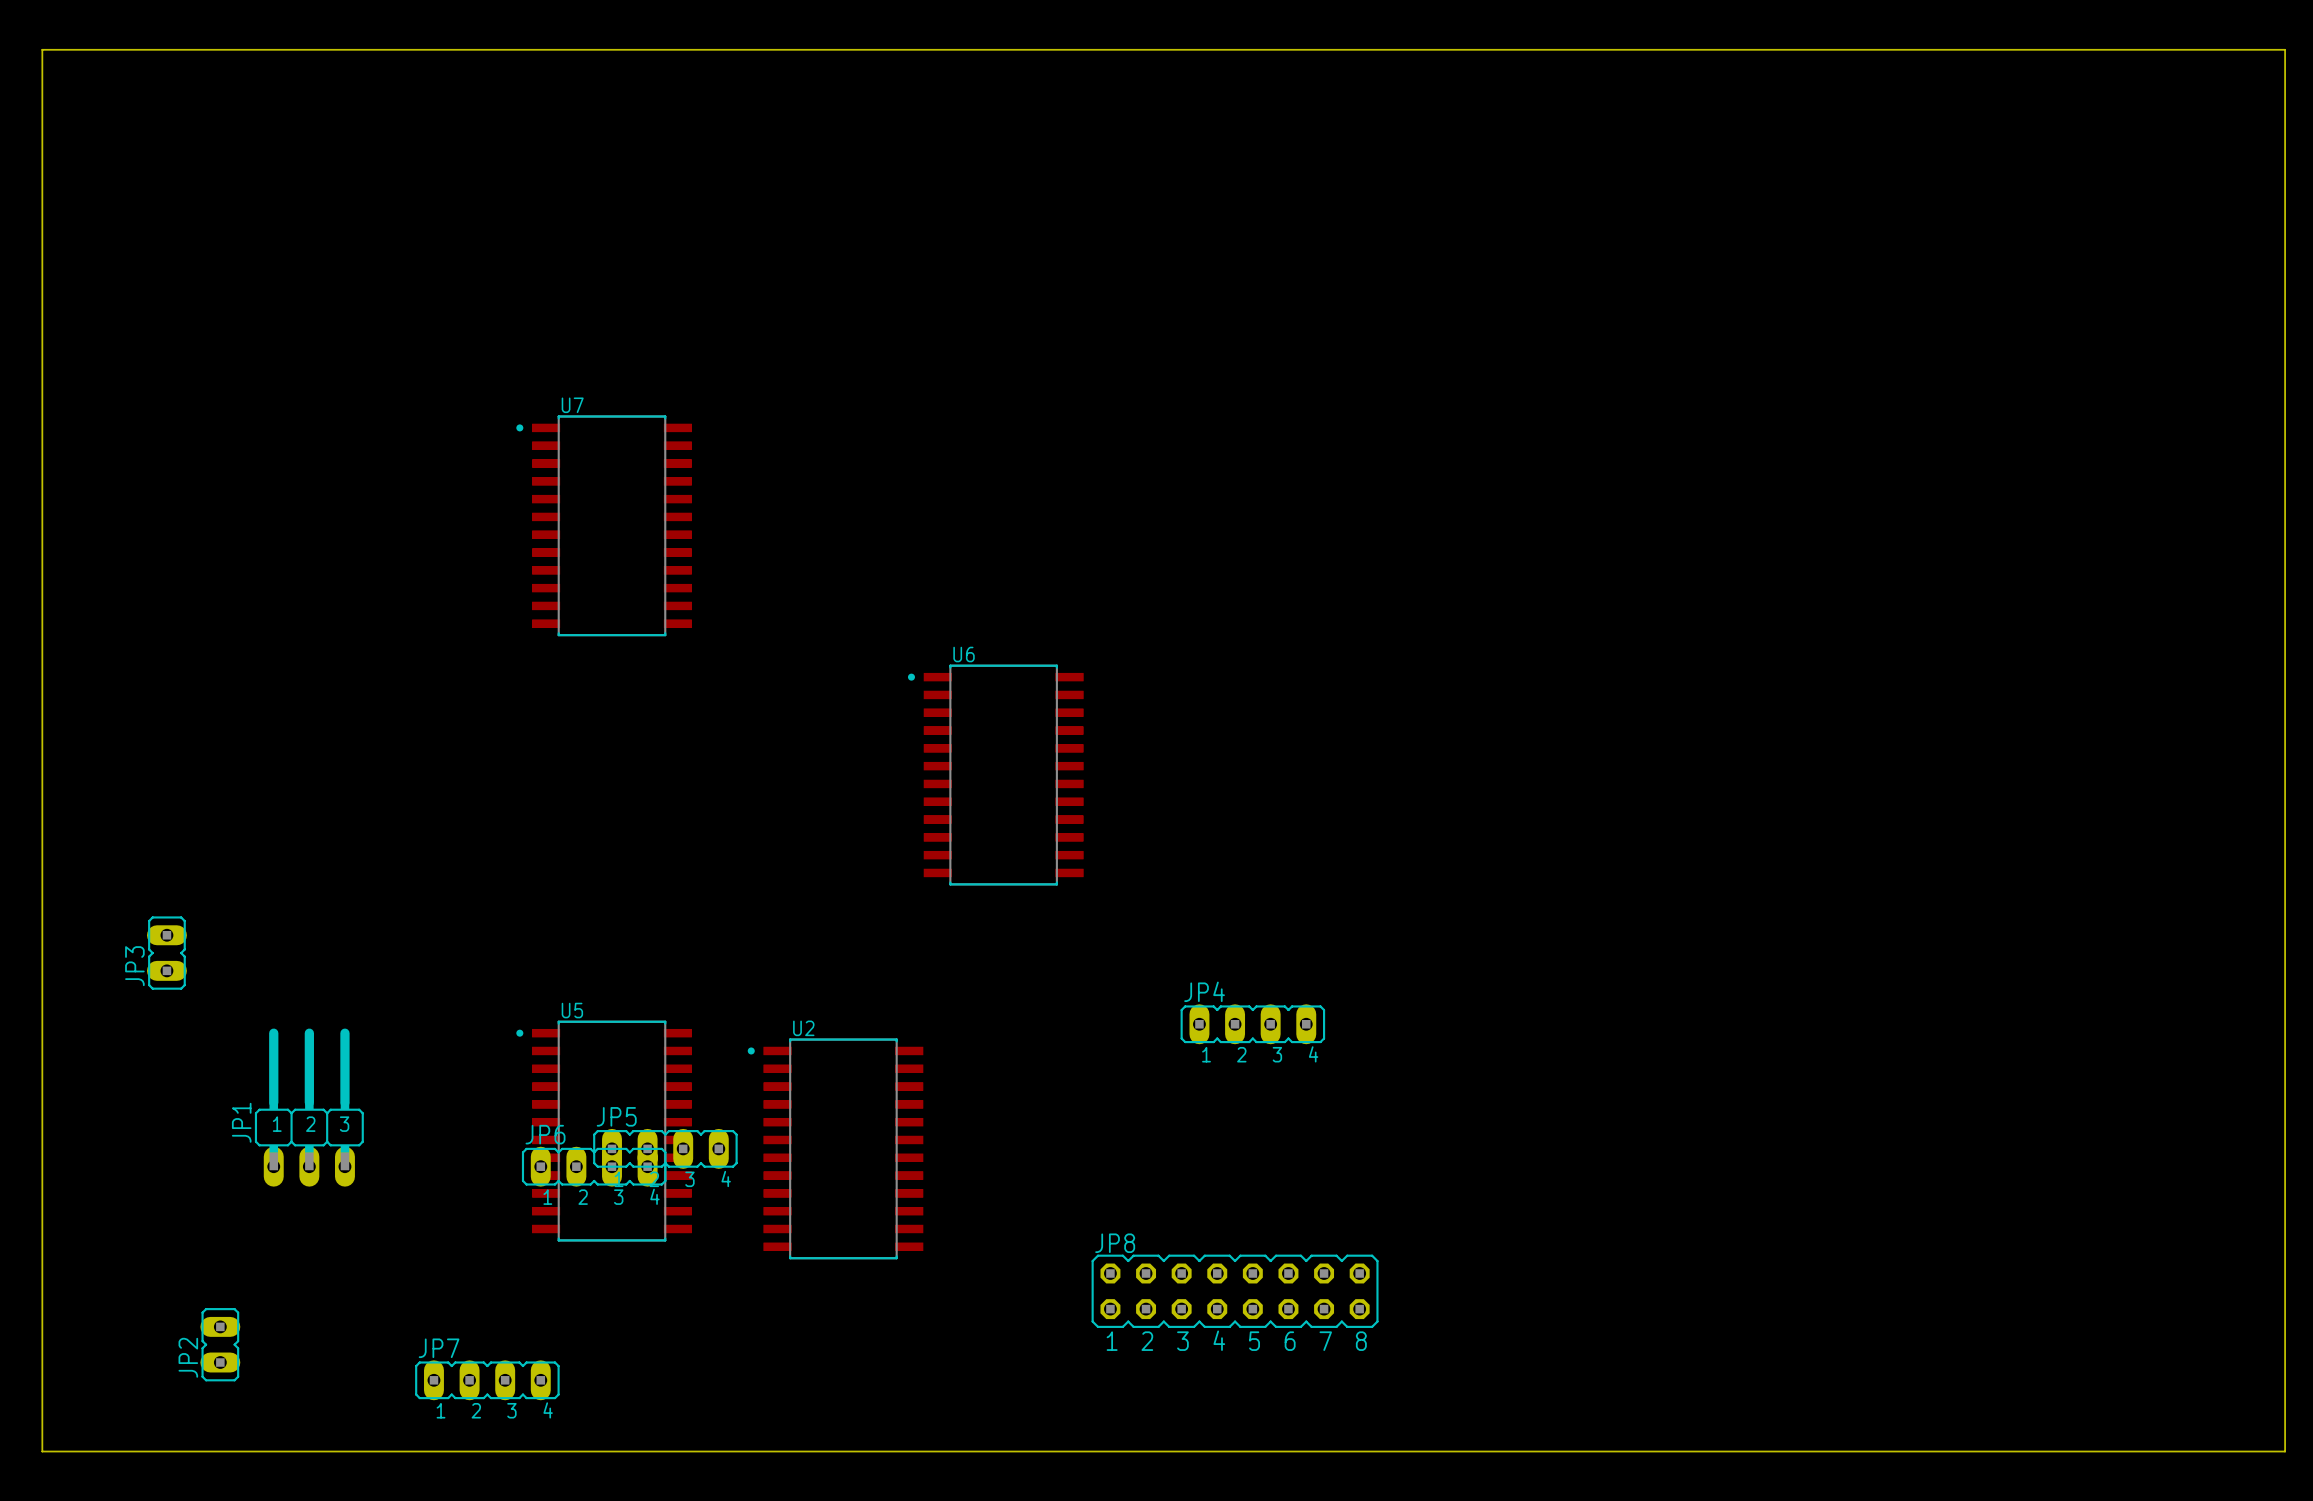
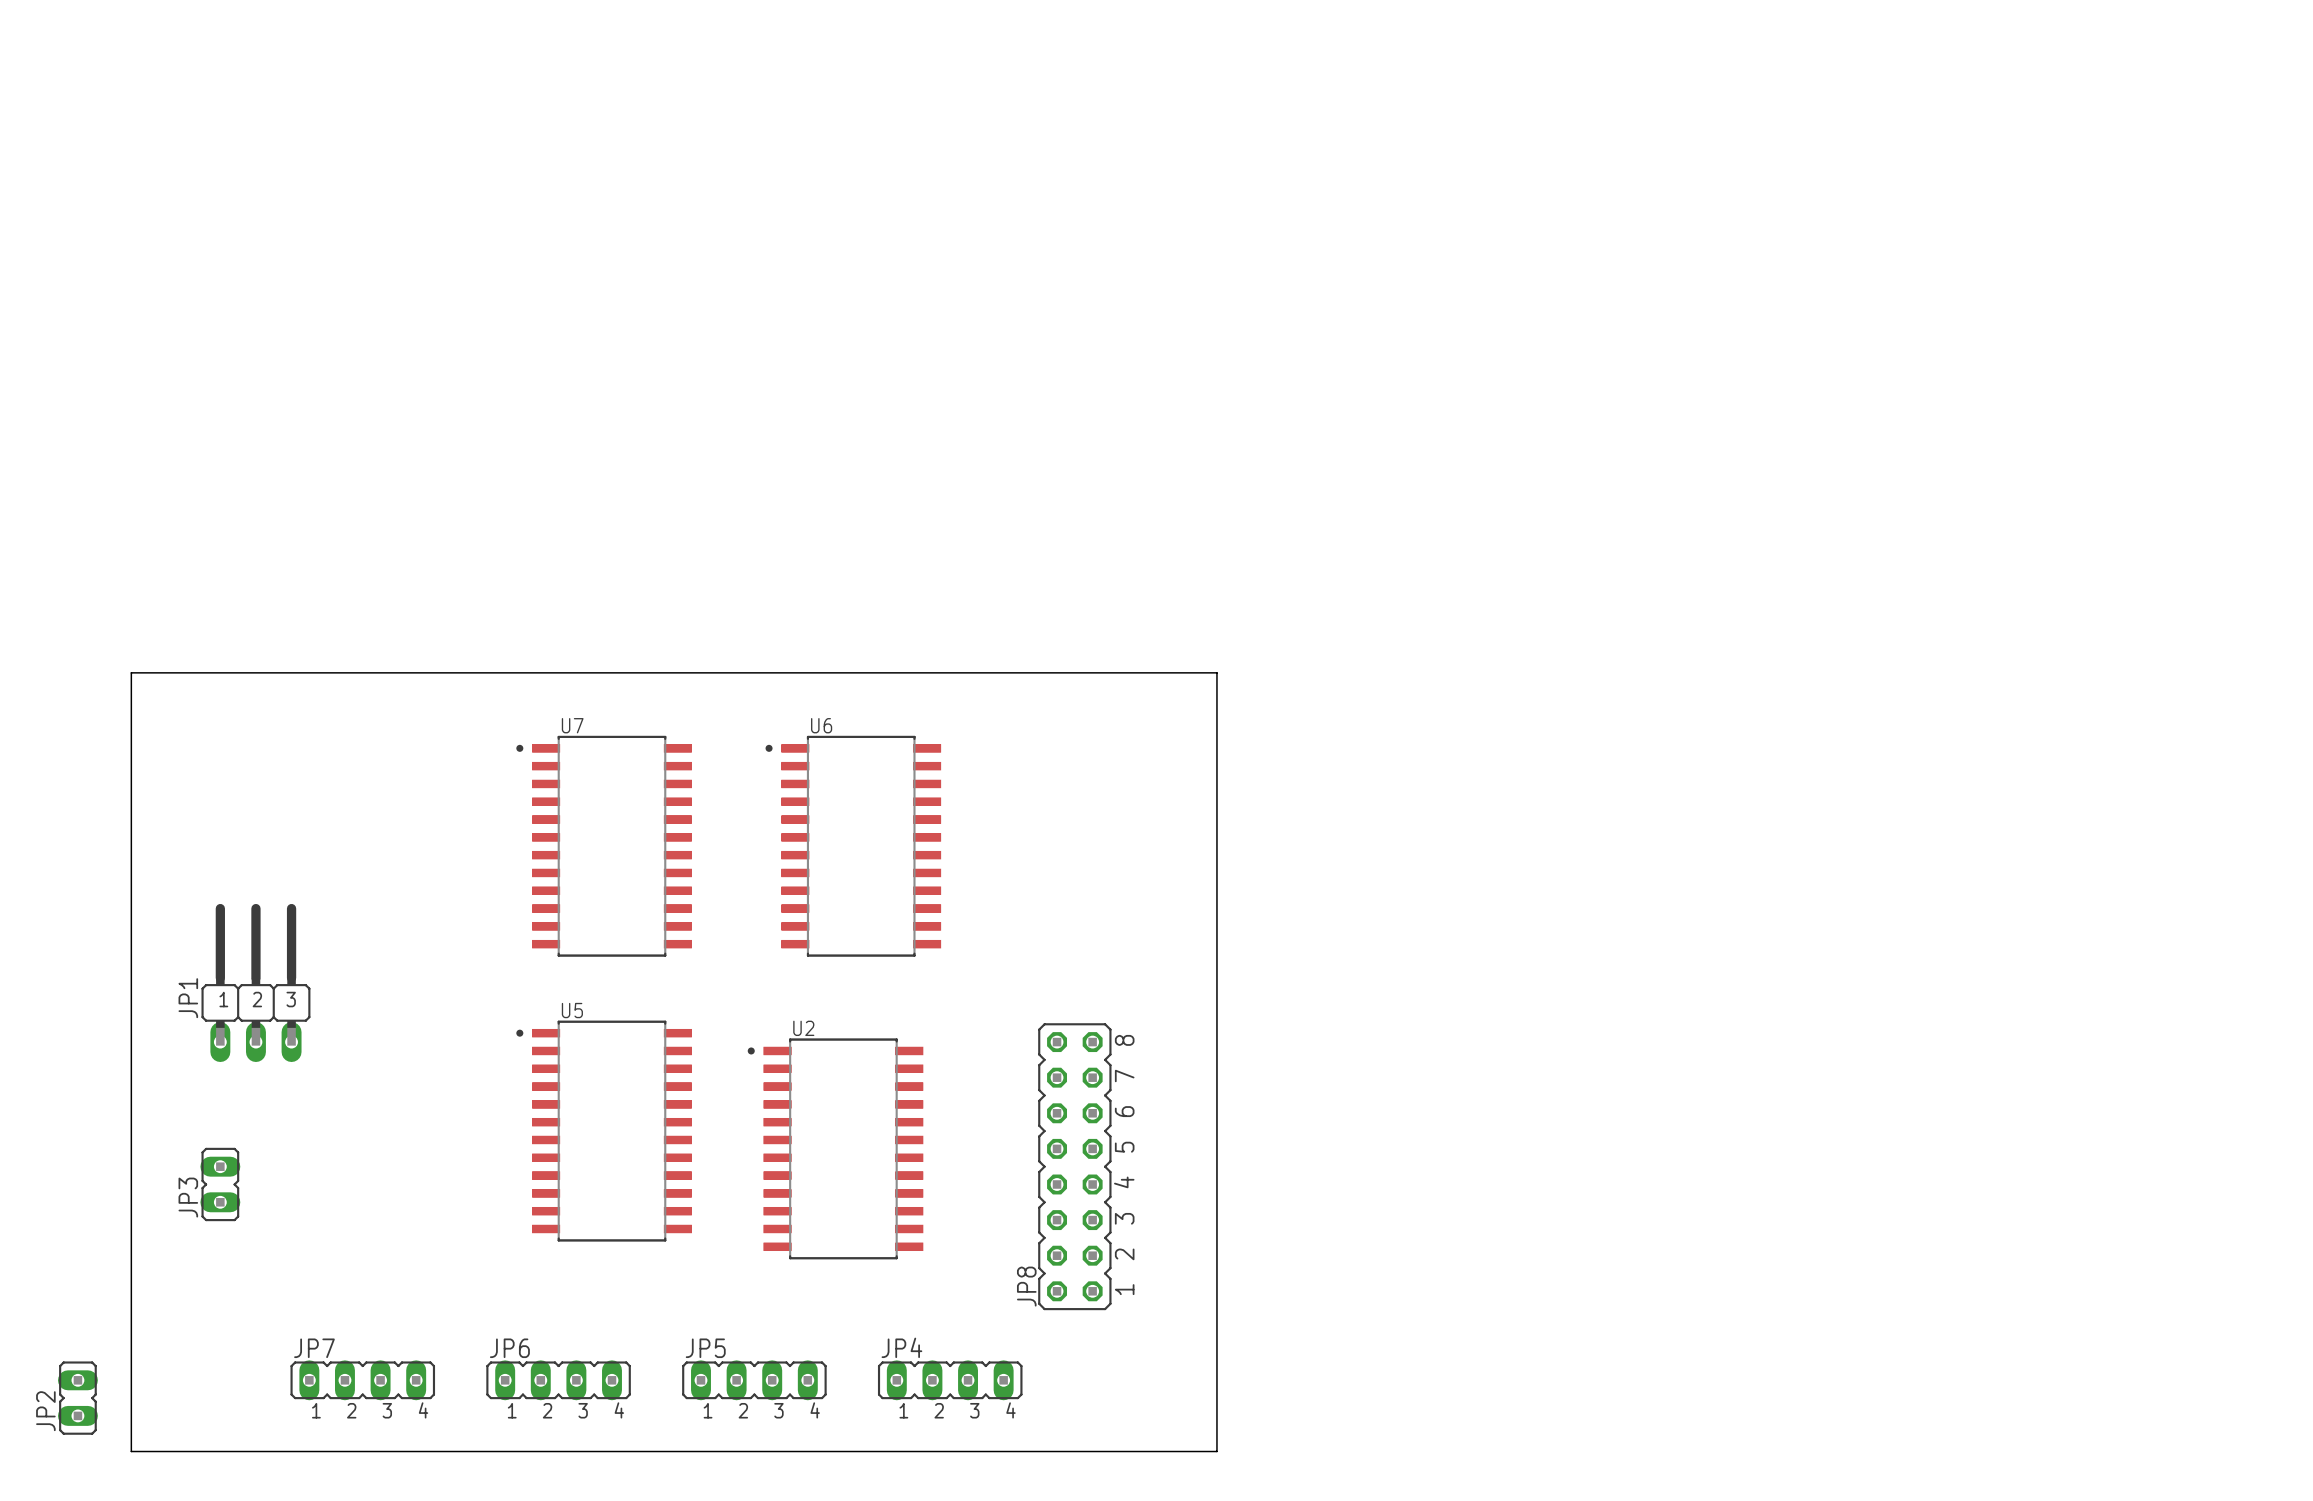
U7 position: (604, 525) -> (604, 846)
U6 position: (995, 775) -> (853, 846)
JP3 position: (166, 953) -> (220, 1184)
JP4 position: (1252, 1024) -> (950, 1380)
JP1 position: (309, 1107) -> (255, 982)
JP5 position: (665, 1148) -> (754, 1380)
JP6 position: (594, 1166) -> (558, 1380)
JP8 rotation: 0° (1235, 1291) -> 90° counterclockwise (1074, 1166)
JP8 position: (1235, 1291) -> (1074, 1166)
JP2 position: (220, 1344) -> (77, 1398)
JP7 position: (487, 1380) -> (362, 1380)
board edge: (131, 1451) (42, 1451) (42, 49) (2285, 49) (2285, 1451) (1216, 1451) -> (131, 1451) (131, 672) (1216, 672) (1216, 1451)

